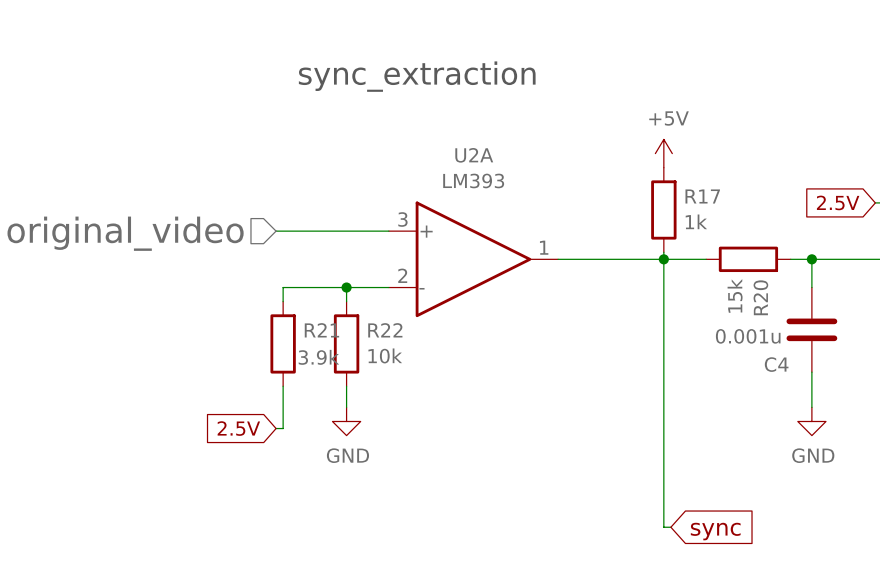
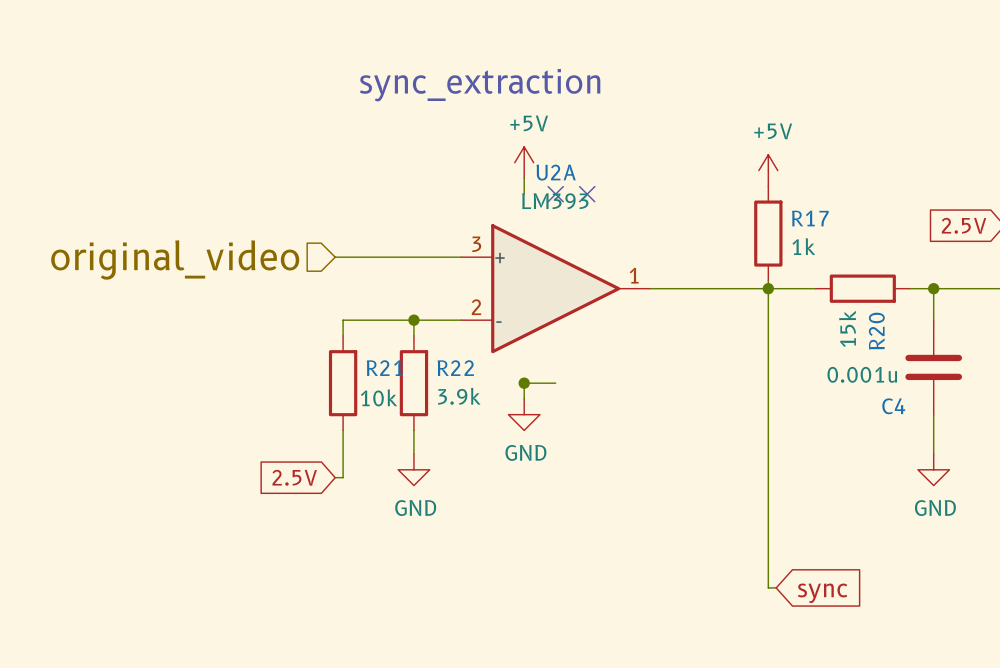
power symbol: none -> +5V (524, 162)
wire: none -> (524, 178) (524, 194)
no-connect mark: none -> (555, 194)
no-connect mark: none -> (587, 194)
junction: none -> (524, 383)
wire: none -> (555, 383) (524, 383) (524, 398)
R22 value: 10k (385, 355) -> 3.9k (459, 396)
R21 value: 3.9k (318, 357) -> 10k (379, 397)
power symbol: none -> GND (524, 414)

